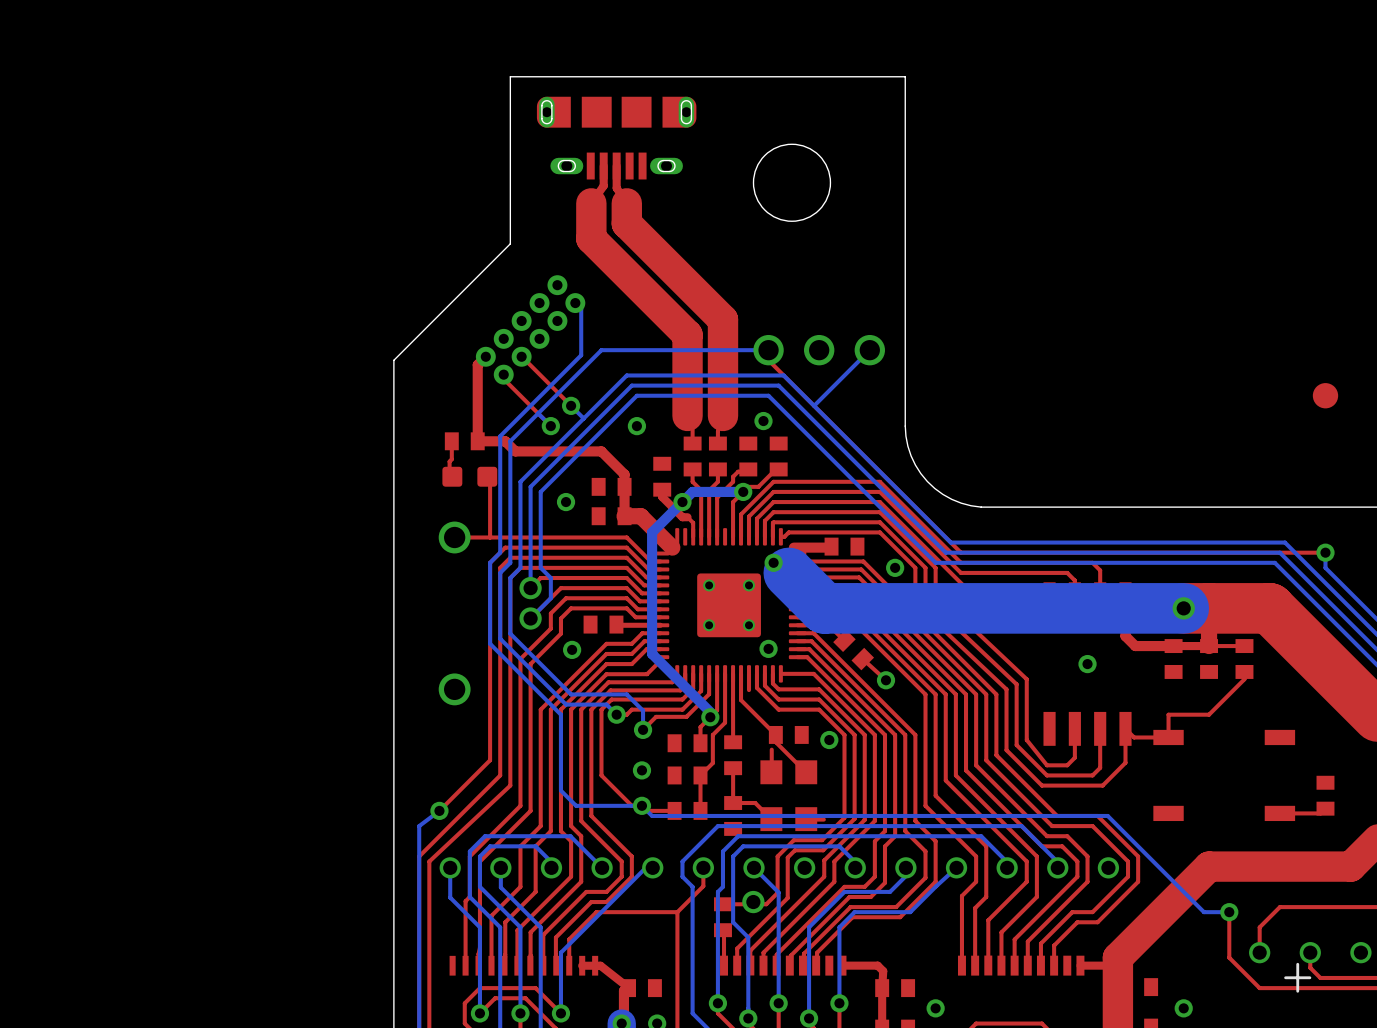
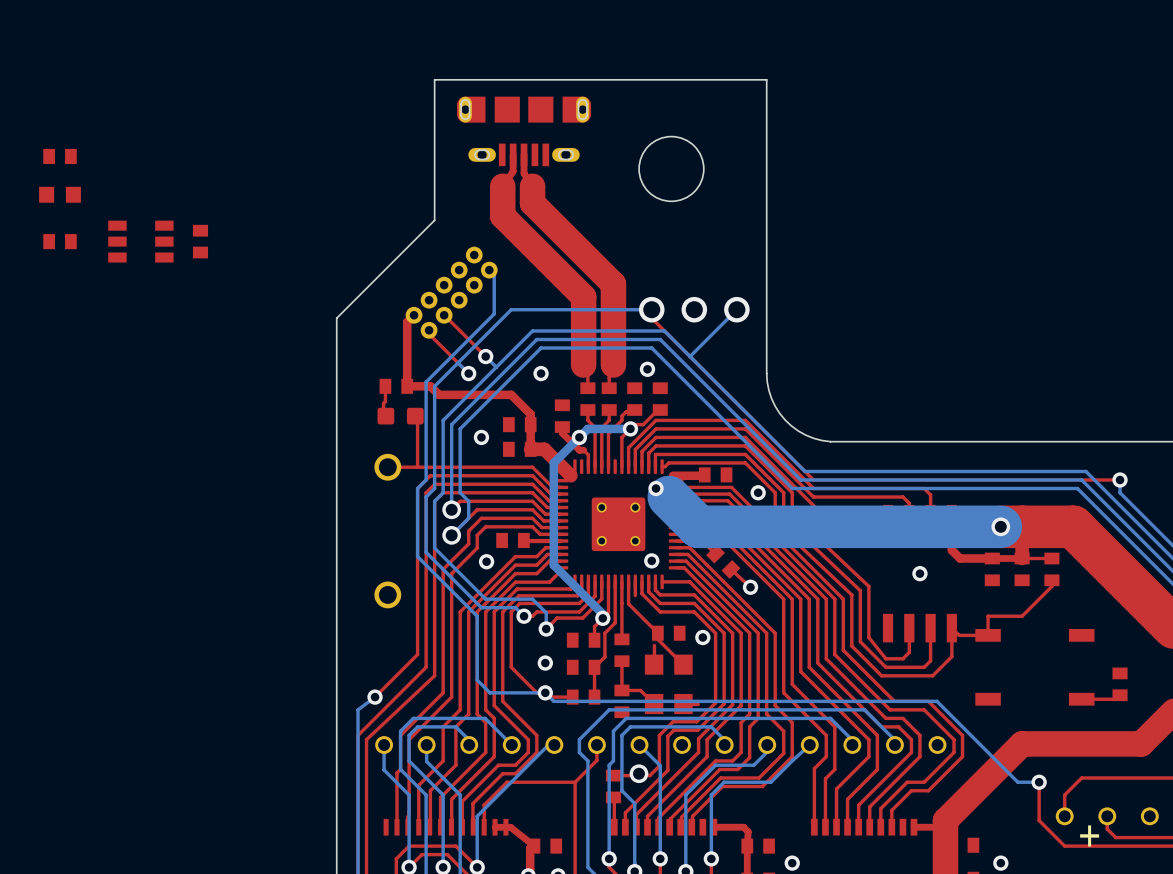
part: none -> (60, 156)
part: none -> (60, 194)
part: none -> (60, 241)
part: none -> (140, 241)
part: none -> (200, 241)
part: (1325, 395) -> none

